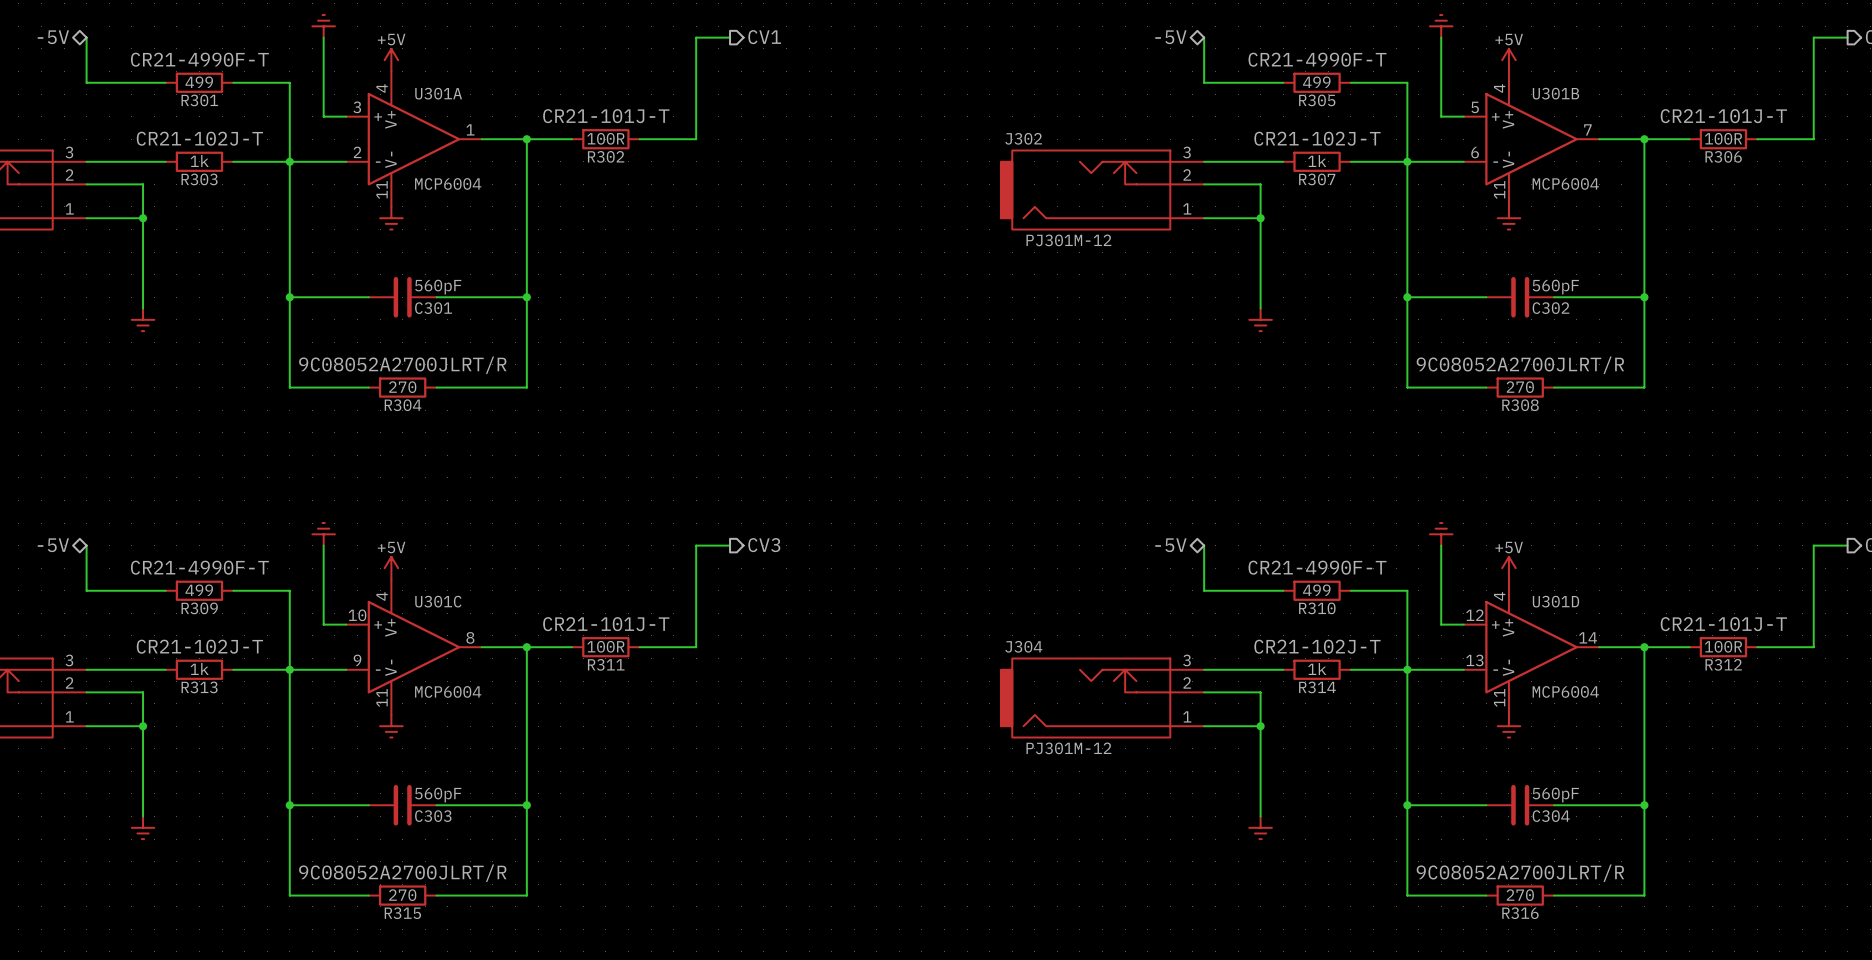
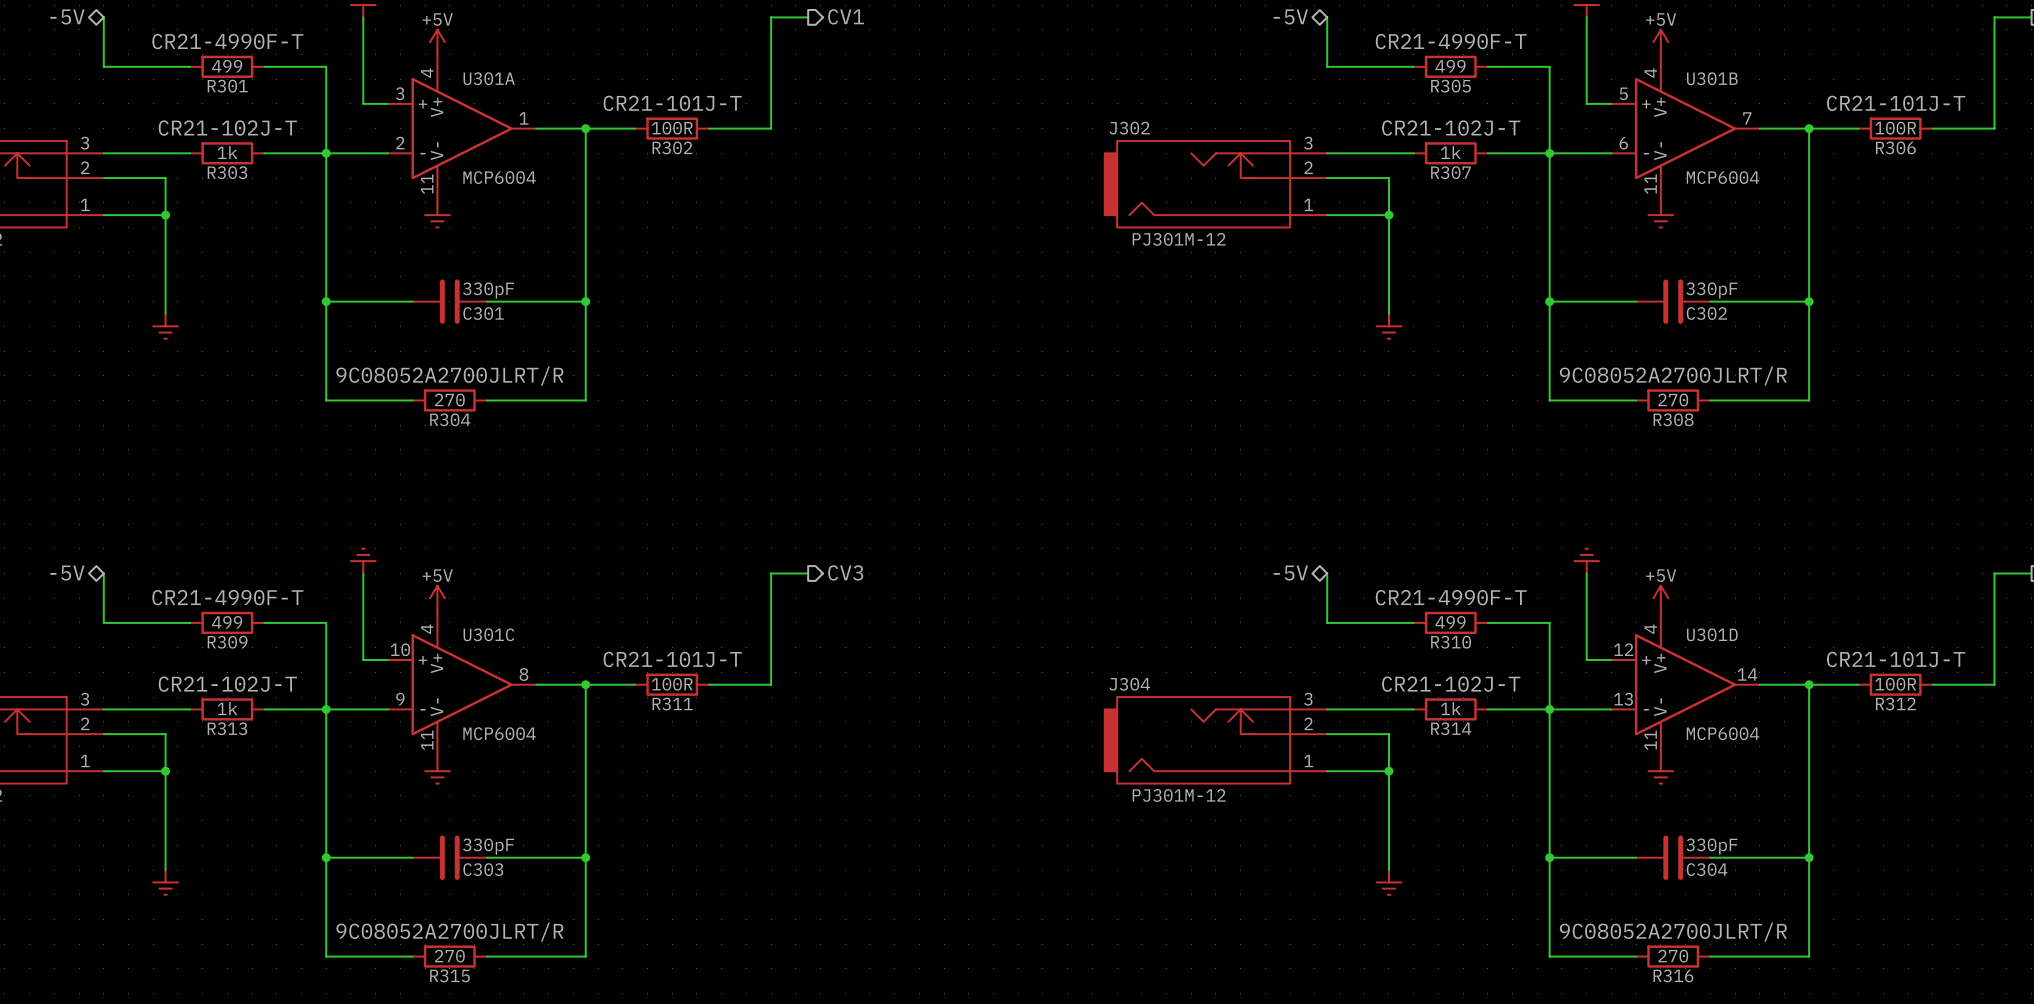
C301 value: 560pF (438, 287) -> 330pF (488, 290)
C302 value: 560pF (1555, 287) -> 330pF (1711, 290)
C303 value: 560pF (438, 795) -> 330pF (488, 846)
C304 value: 560pF (1555, 795) -> 330pF (1711, 846)

